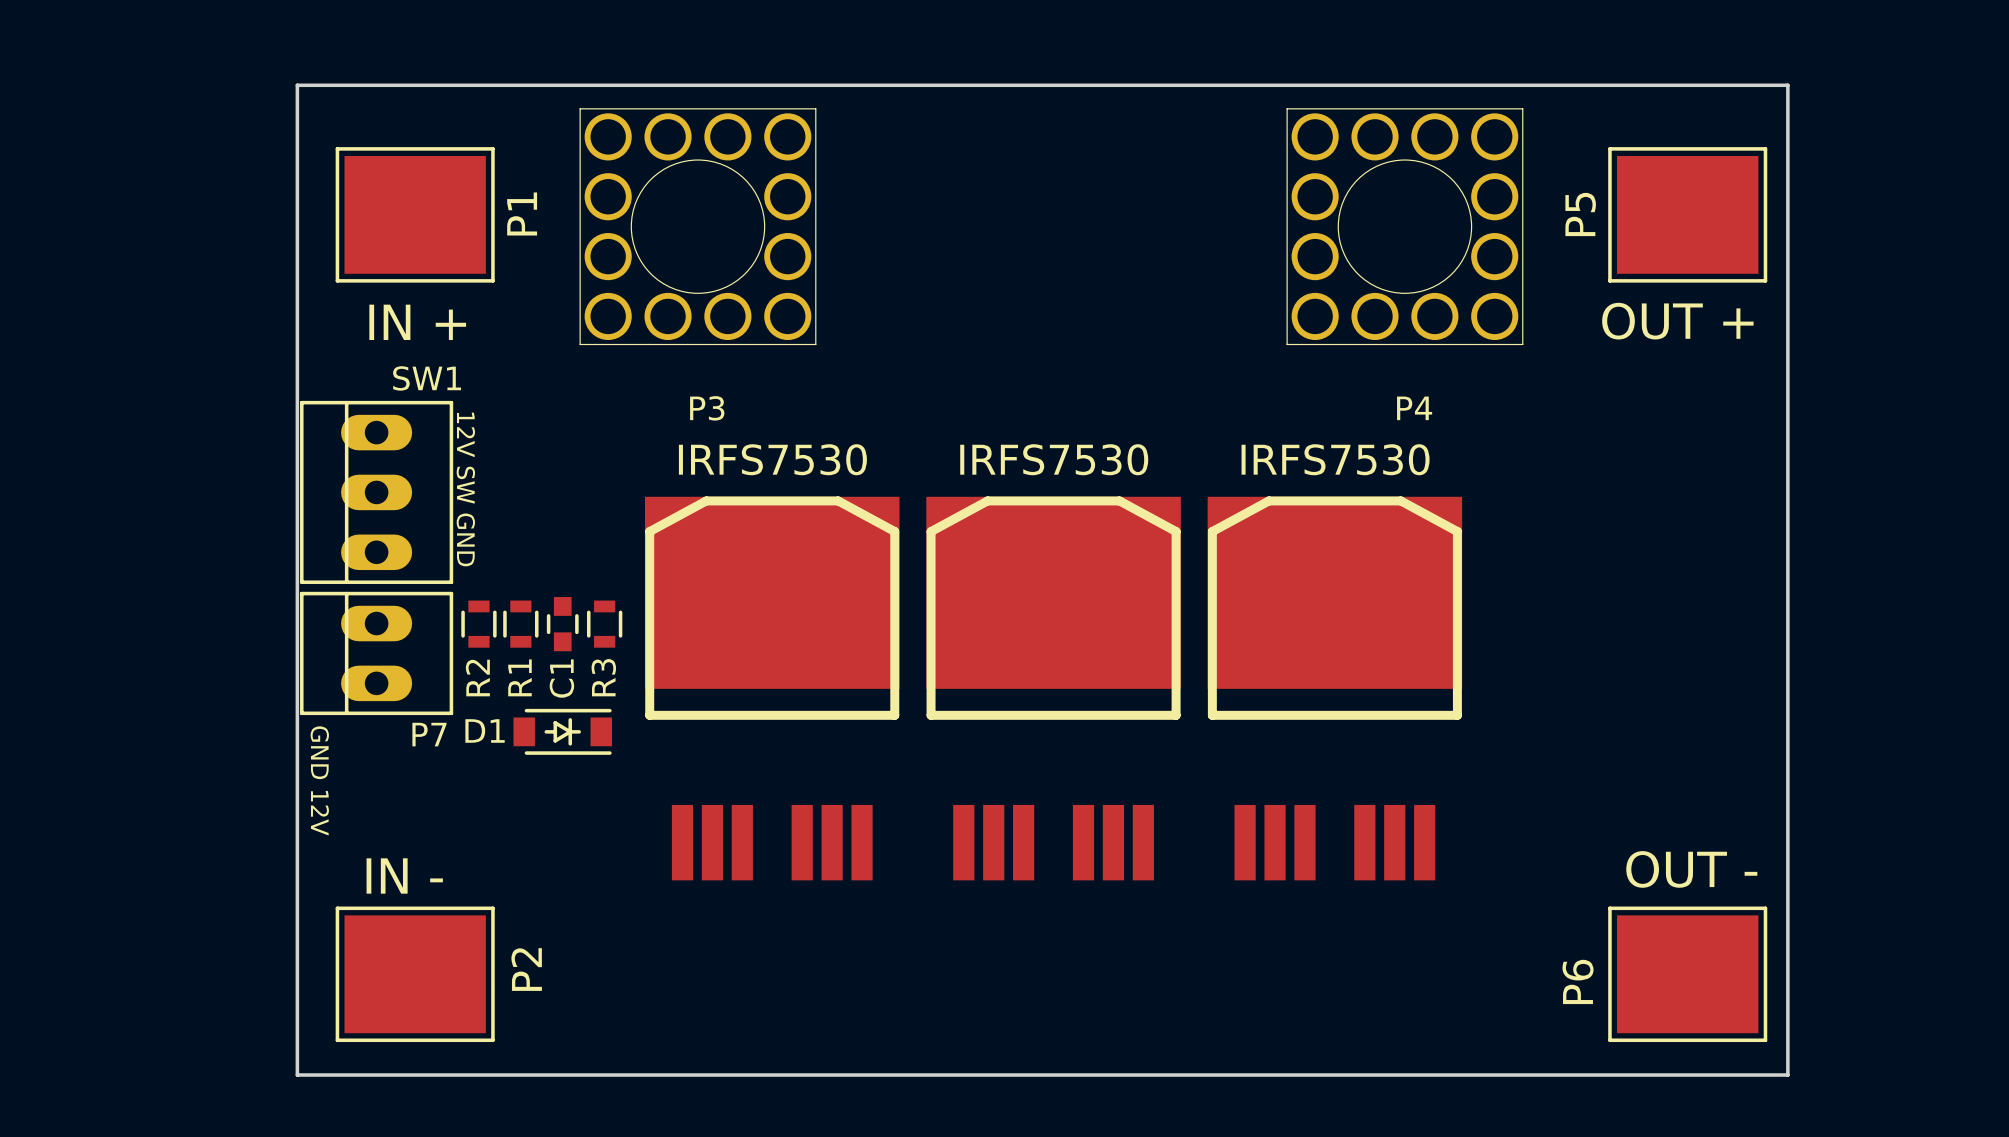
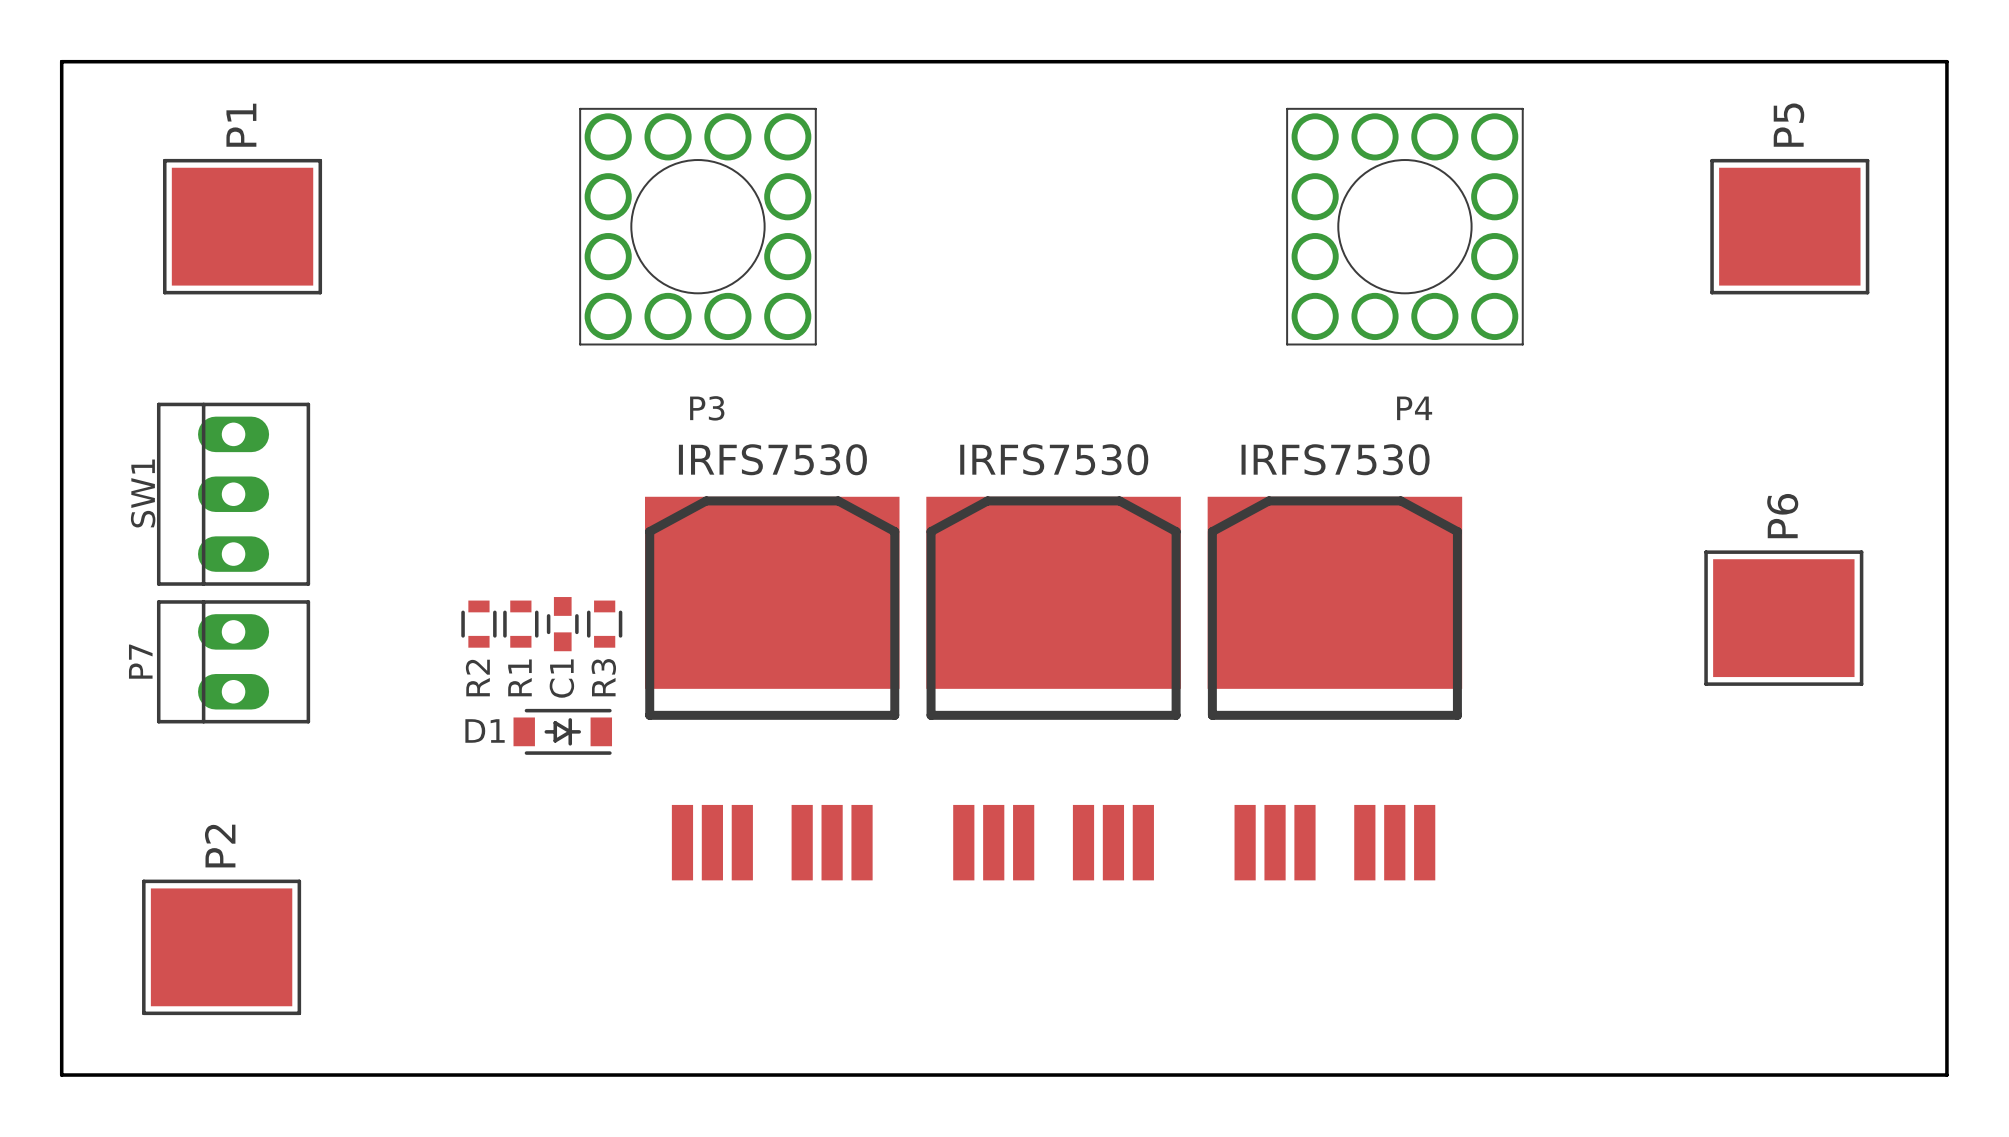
P1 name position: P1 (522, 213) -> P1 (241, 125)
P1 position: (415, 214) -> (242, 226)
P5 name position: P5 (1580, 214) -> P5 (1788, 125)
P5 position: (1687, 214) -> (1789, 226)
text: OUT + (1677, 321) -> none
text: IN + (417, 322) -> none
SW1 name rotation: 0° (427, 378) -> 90° counterclockwise (143, 493)
SW1 name position: SW1 (427, 378) -> SW1 (143, 493)
text: 12V SW GND (465, 489) -> none
SW1 position: (376, 492) -> (233, 494)
P7 position: (376, 653) -> (233, 661)
P7 name rotation: 0° (429, 734) -> 90° counterclockwise (140, 661)
P7 name position: P7 (429, 734) -> P7 (140, 661)
text: GND 12V (319, 780) -> none
text: OUT - (1691, 869) -> none
text: IN - (404, 875) -> none
P2 name position: P2 (526, 969) -> P2 (220, 846)
P2 position: (415, 974) -> (221, 947)
P6 position: (1687, 974) -> (1783, 618)
P6 name position: P6 (1578, 981) -> P6 (1782, 516)
board edge: (297, 1075) (297, 85) (1787, 85) (1787, 1075) -> (297, 1075) (61, 1075) (61, 61) (1946, 61) (1946, 1075) (1787, 1075)

